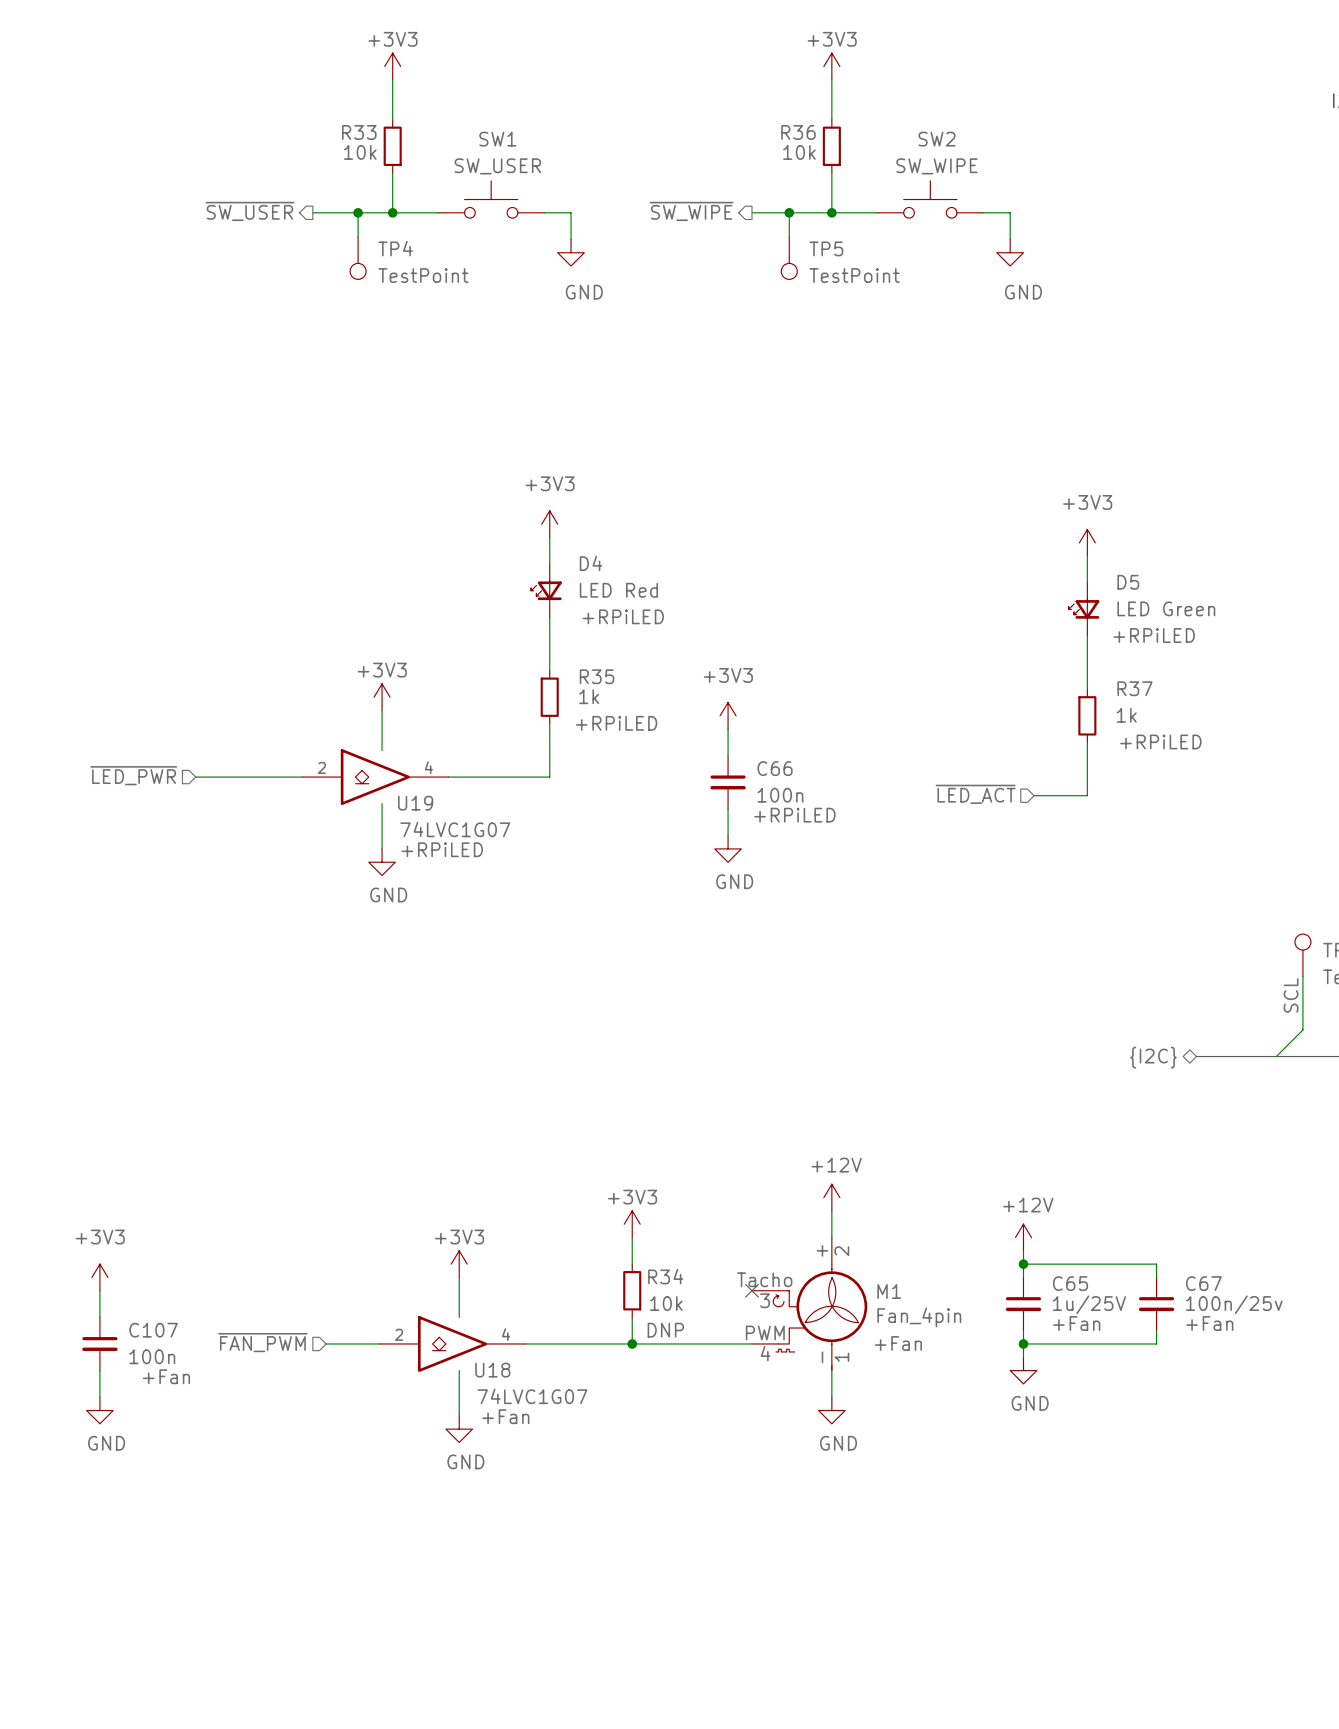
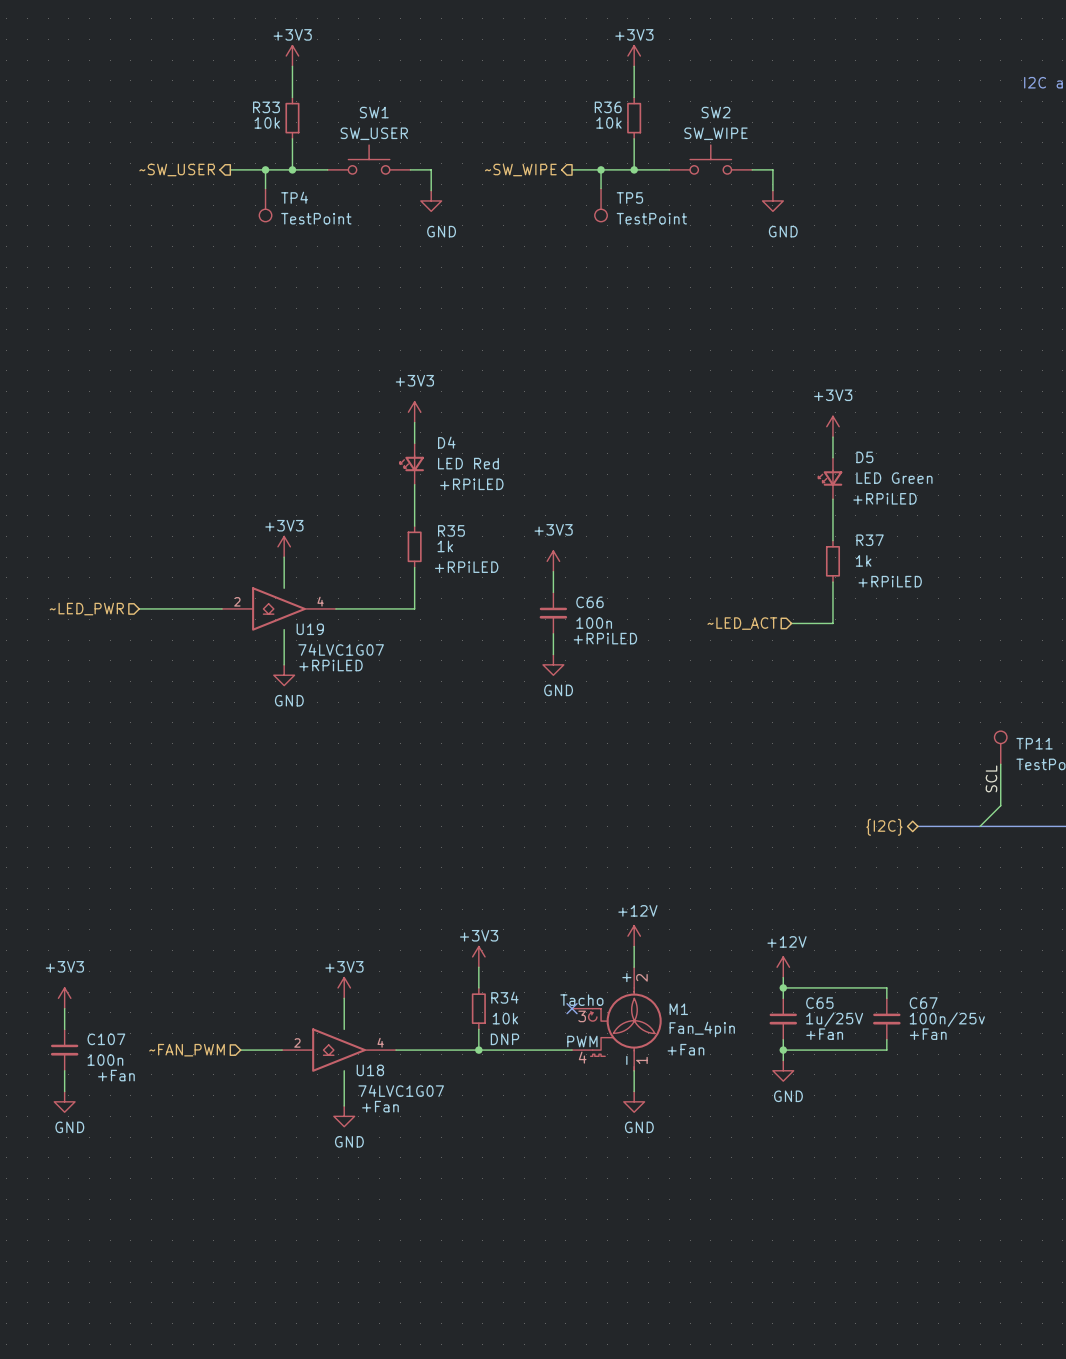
hierarchical label: ~{SW_USER} (249, 211) -> ~SW_USER (177, 170)
hierarchical label: ~{SW_WIPE} (691, 211) -> ~SW_WIPE (520, 170)
hierarchical label: ~{LED_PWR} (133, 775) -> ~LED_PWR (86, 609)
hierarchical label: ~{LED_ACT} (975, 794) -> ~LED_ACT (742, 623)
hierarchical label: ~{FAN_PWM} (262, 1342) -> ~FAN_PWM (187, 1050)

